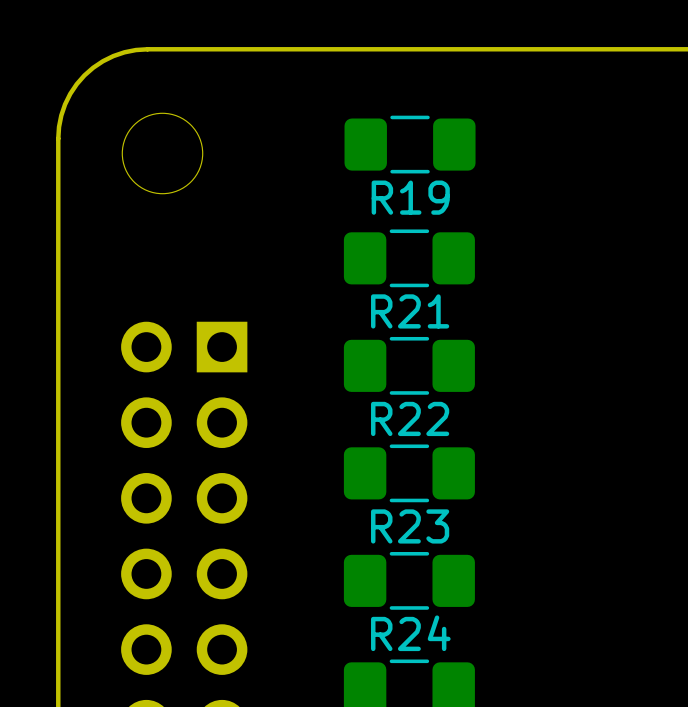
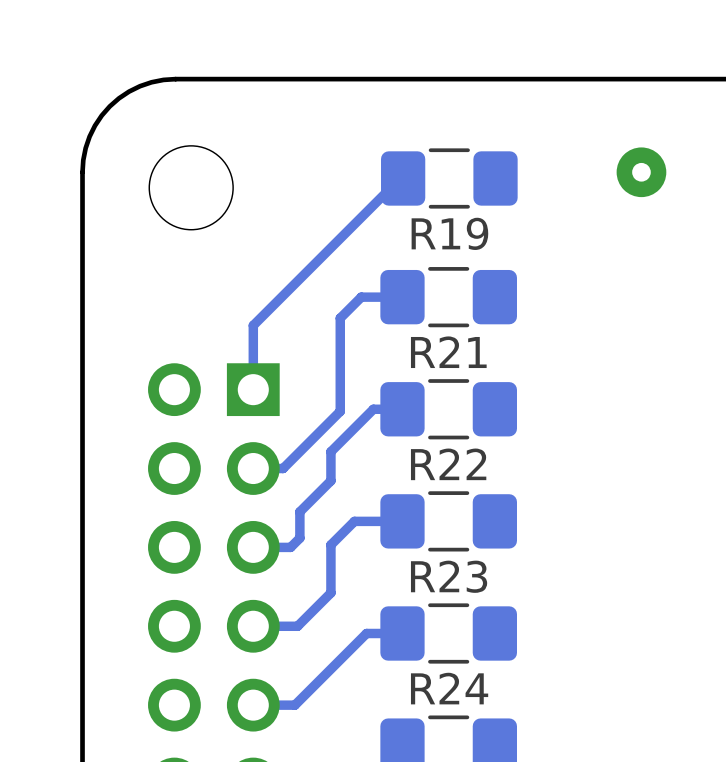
via: none -> (641, 172)
track: none -> (400, 178) (253, 325) (253, 389)
track: none -> (402, 297) (361, 297) (340, 318) (340, 411) (283, 468) (253, 468)
track: none -> (402, 409) (373, 409) (330, 451) (330, 480) (299, 511) (299, 538) (290, 547) (253, 547)
track: none -> (402, 521) (354, 521) (330, 544) (330, 592) (297, 626) (253, 626)
track: none -> (402, 633) (366, 633) (294, 705) (253, 705)

